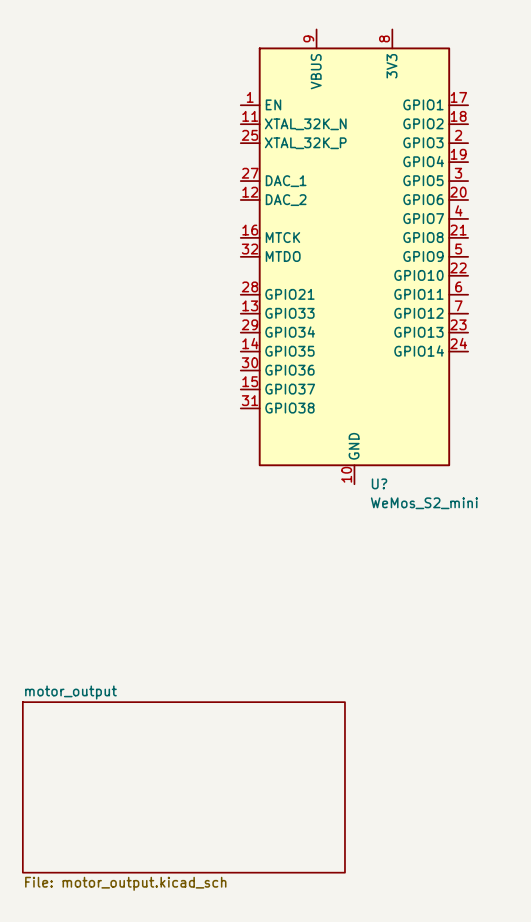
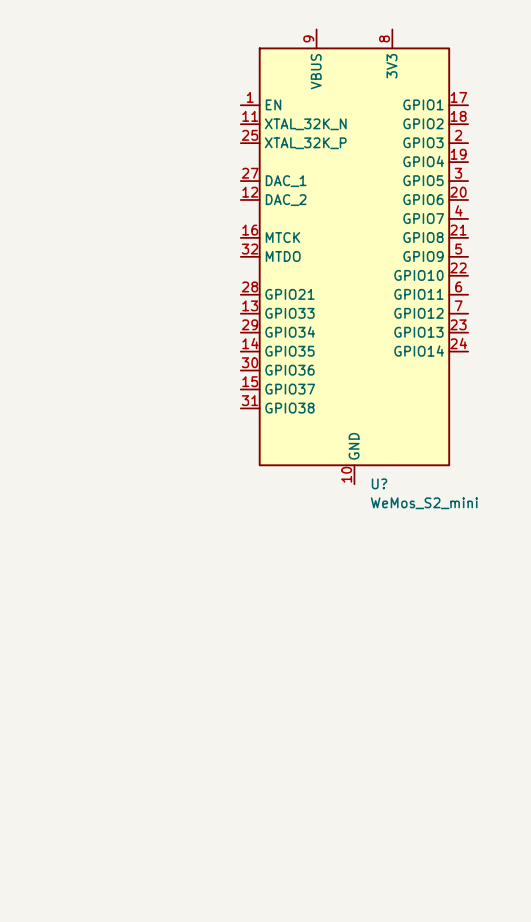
sheet motor_output: File: motor_output.kicad_sch (183, 787) -> none

